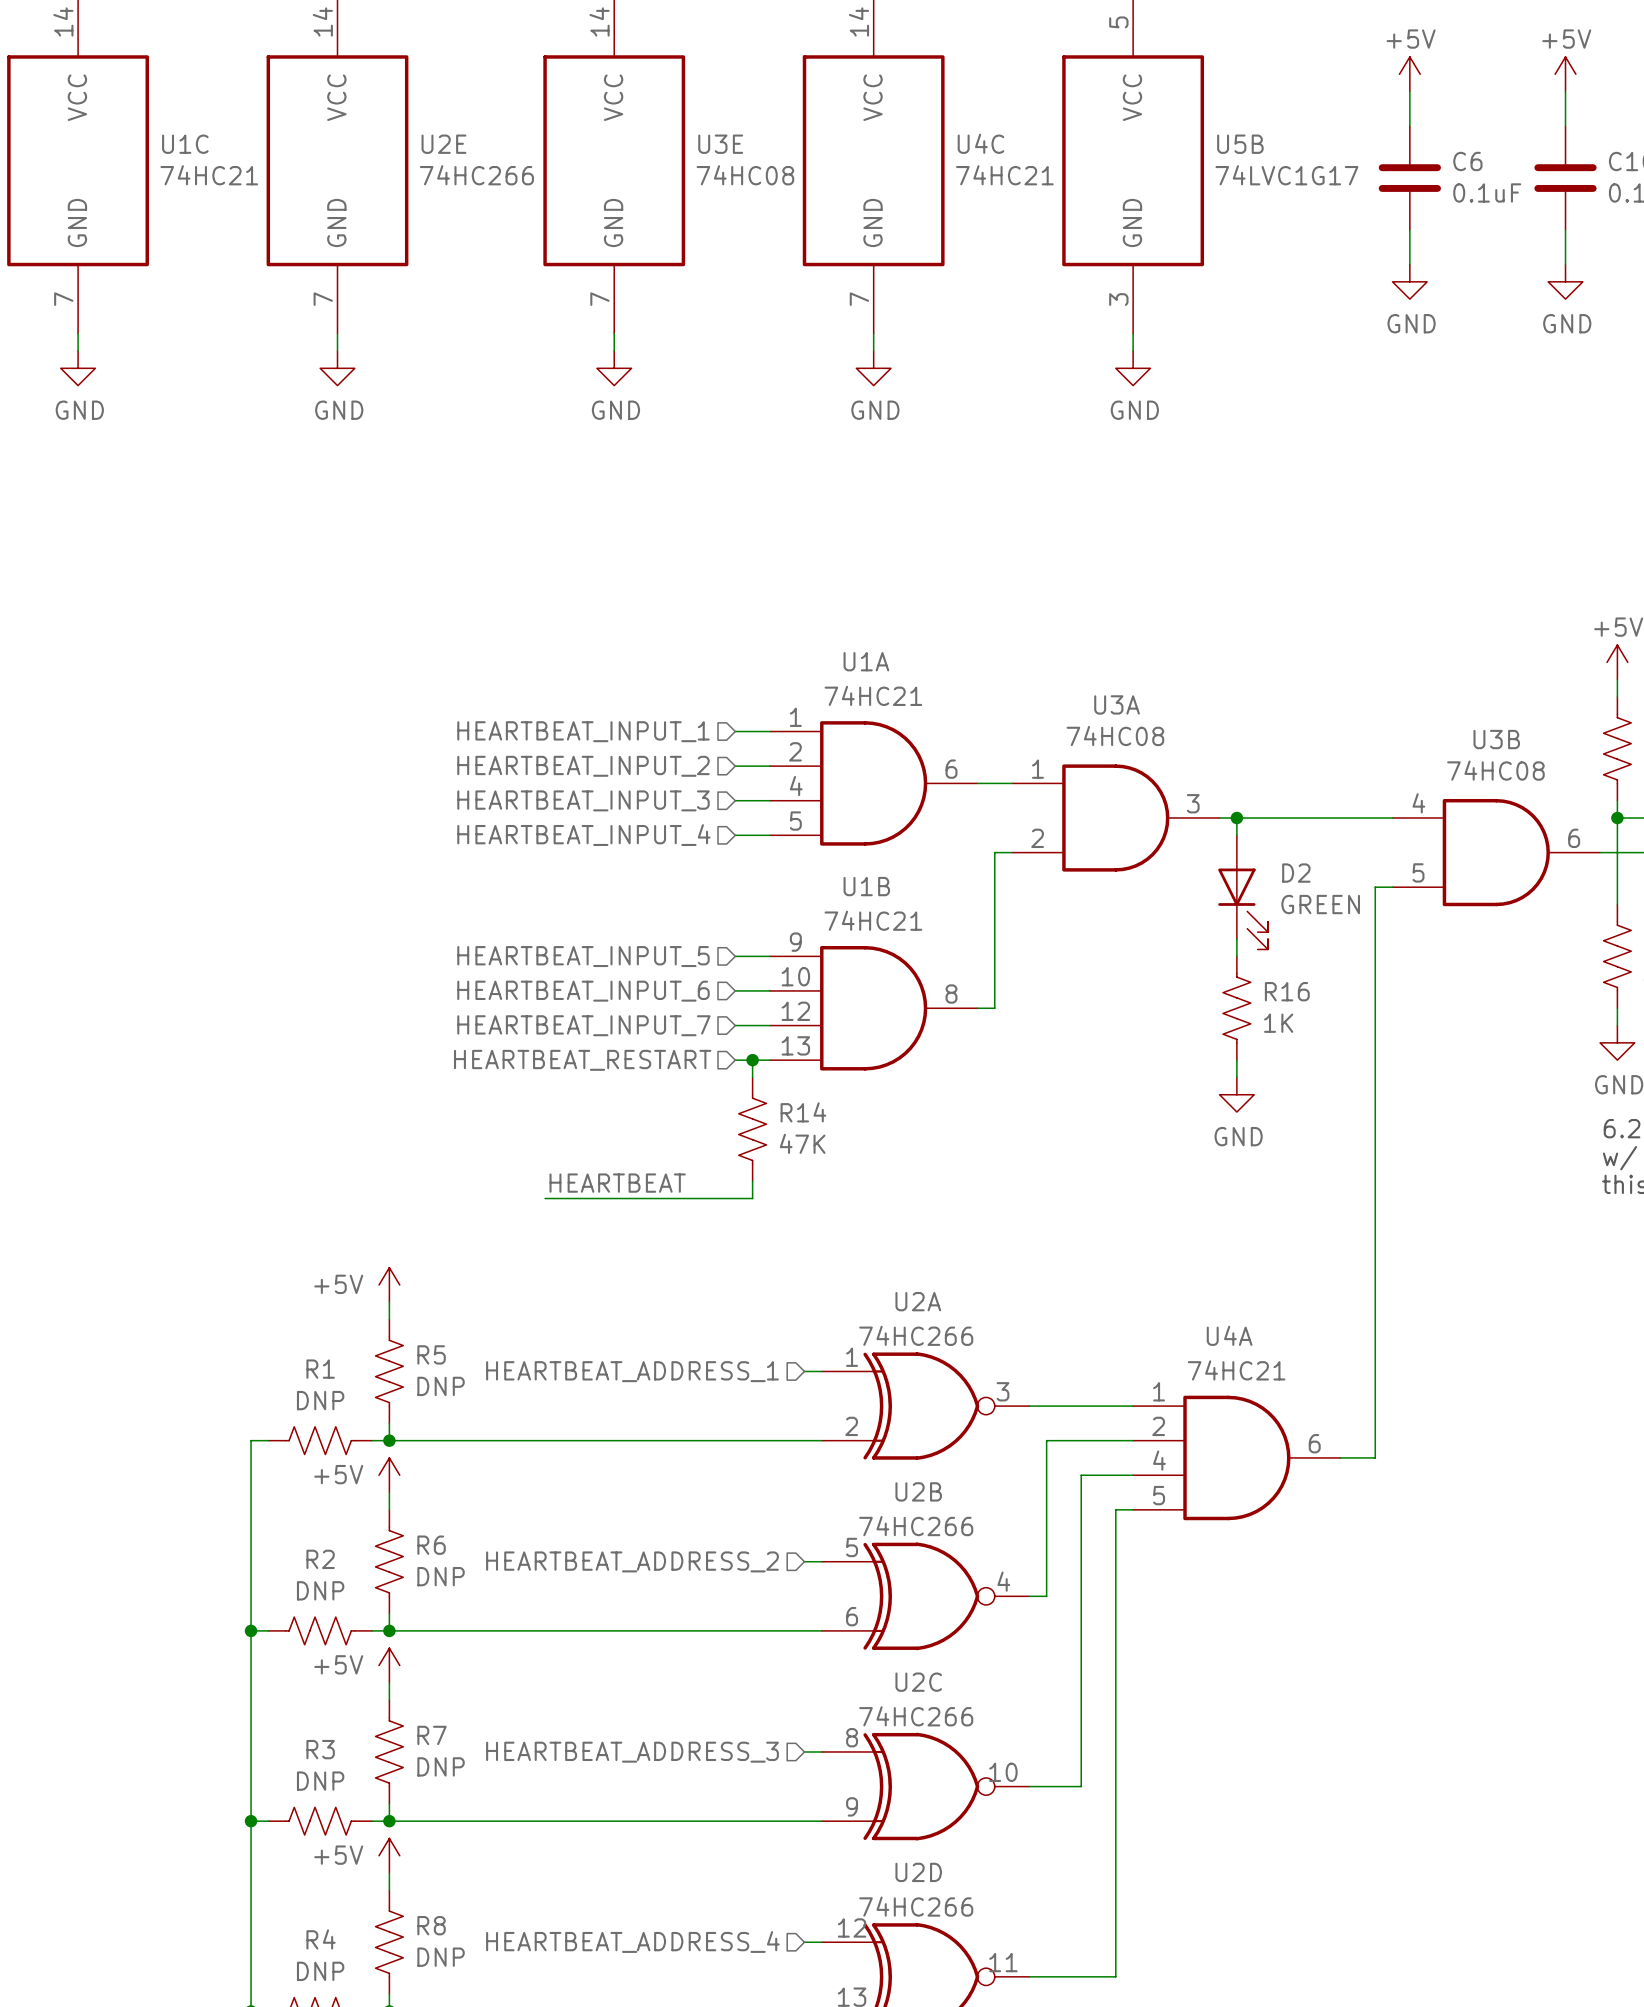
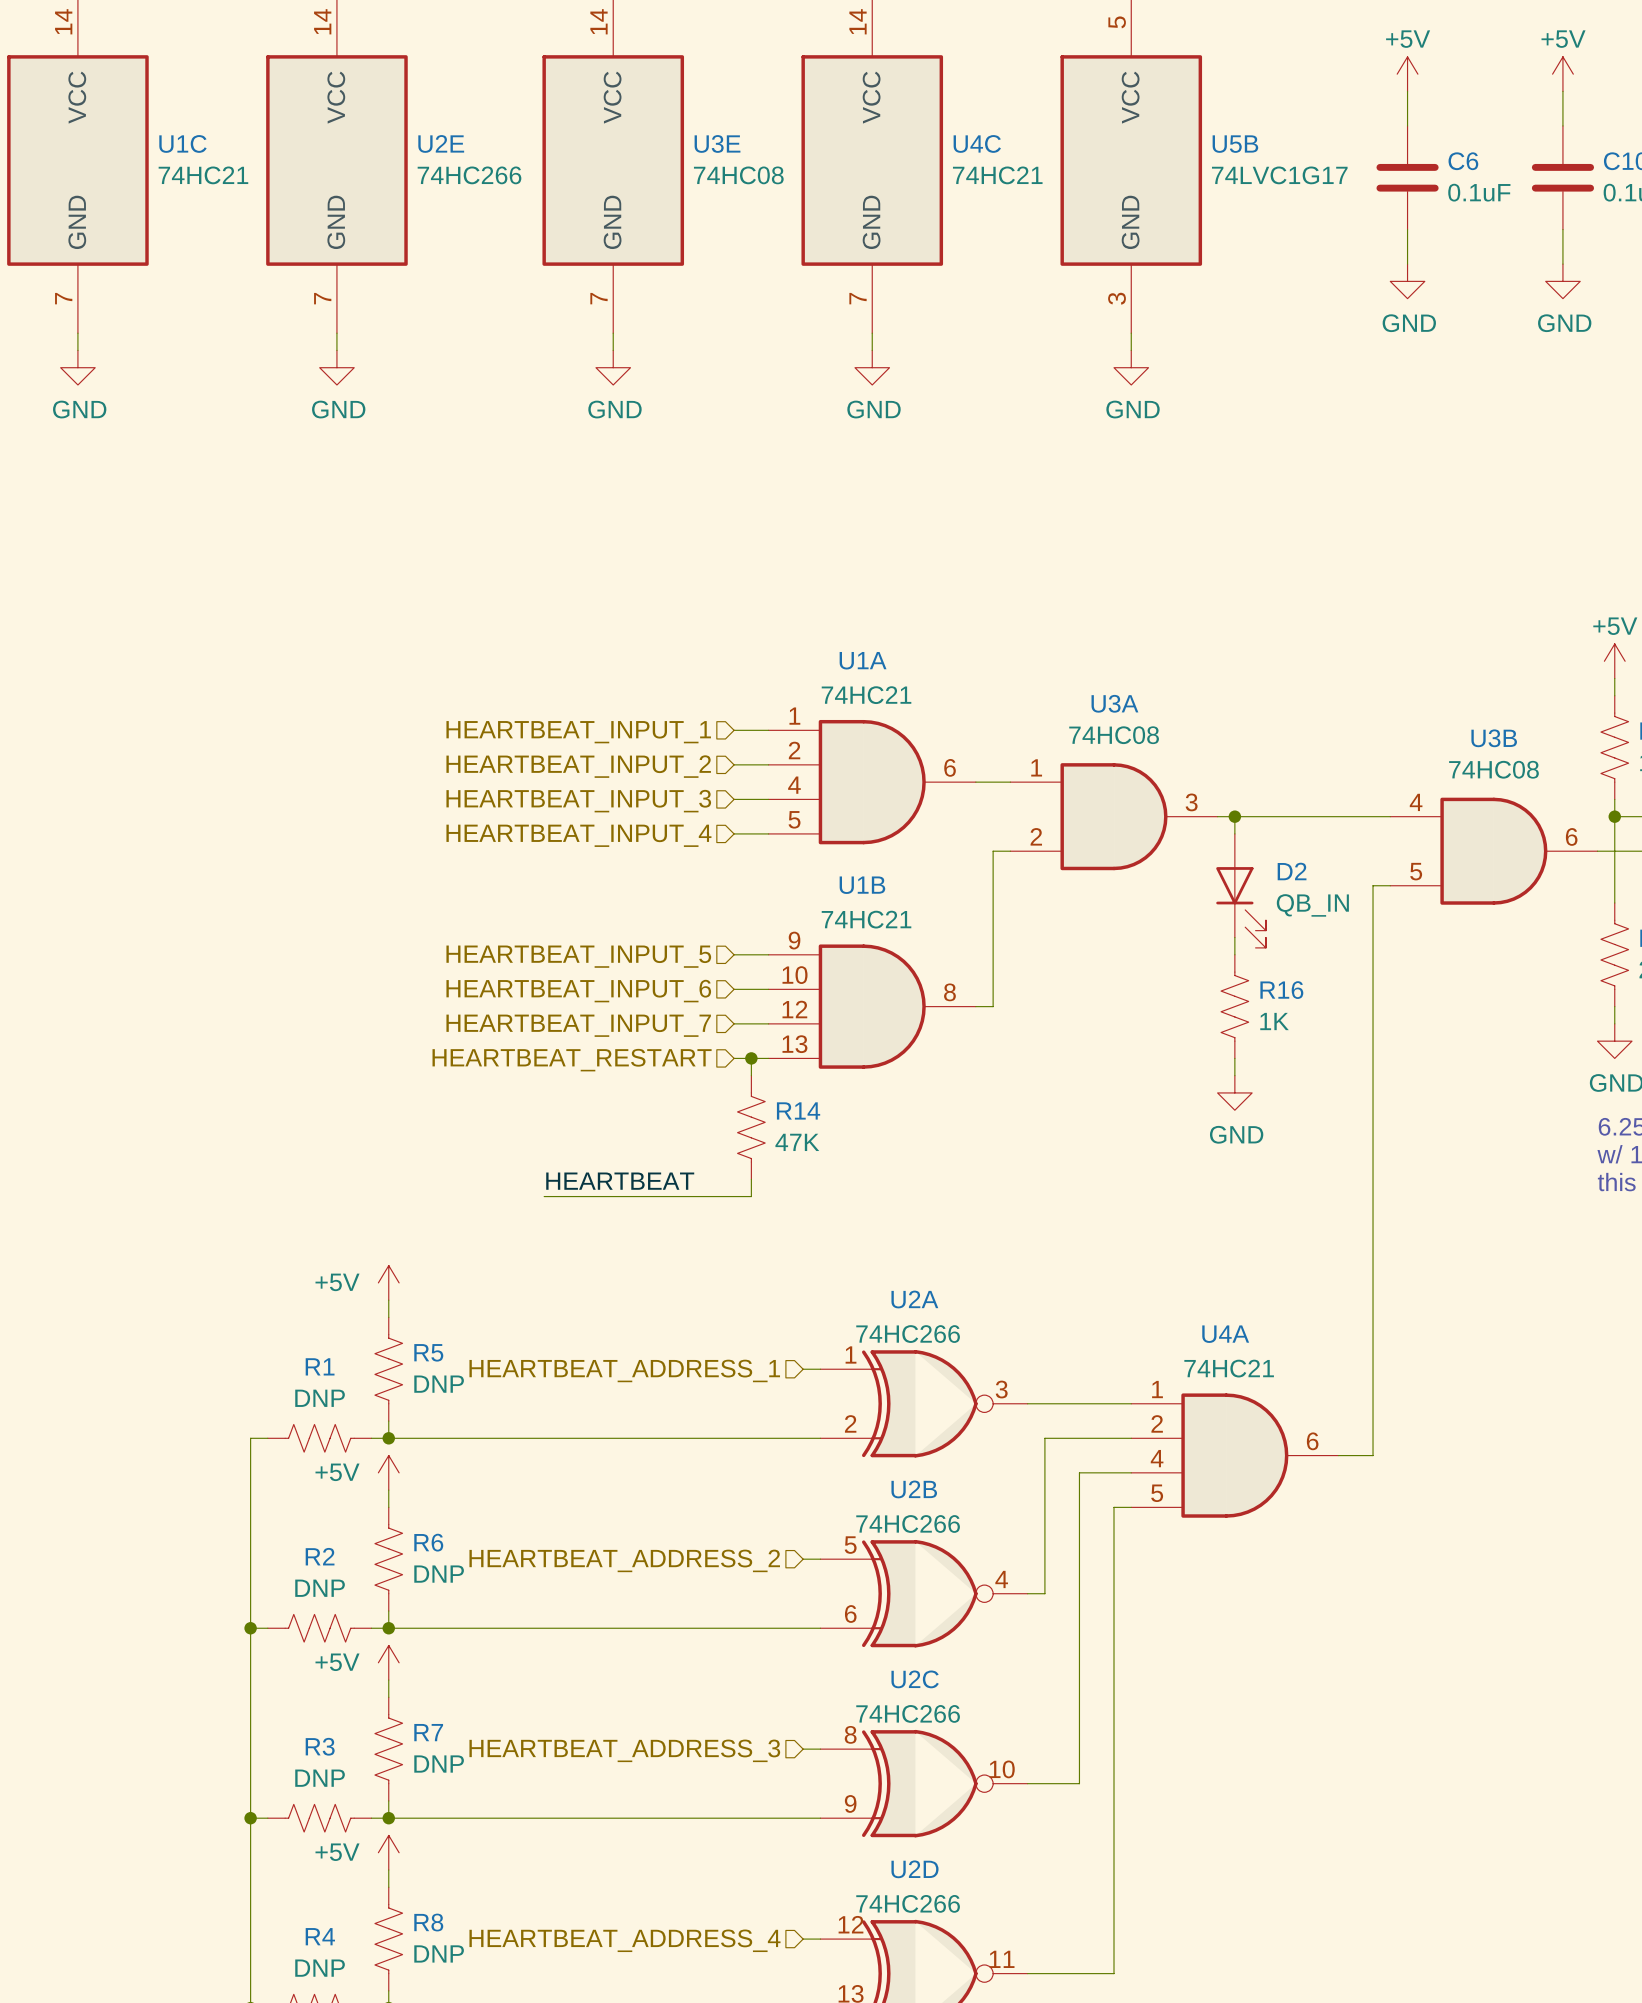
D2 value: GREEN (1320, 904) -> QB_IN (1312, 905)

